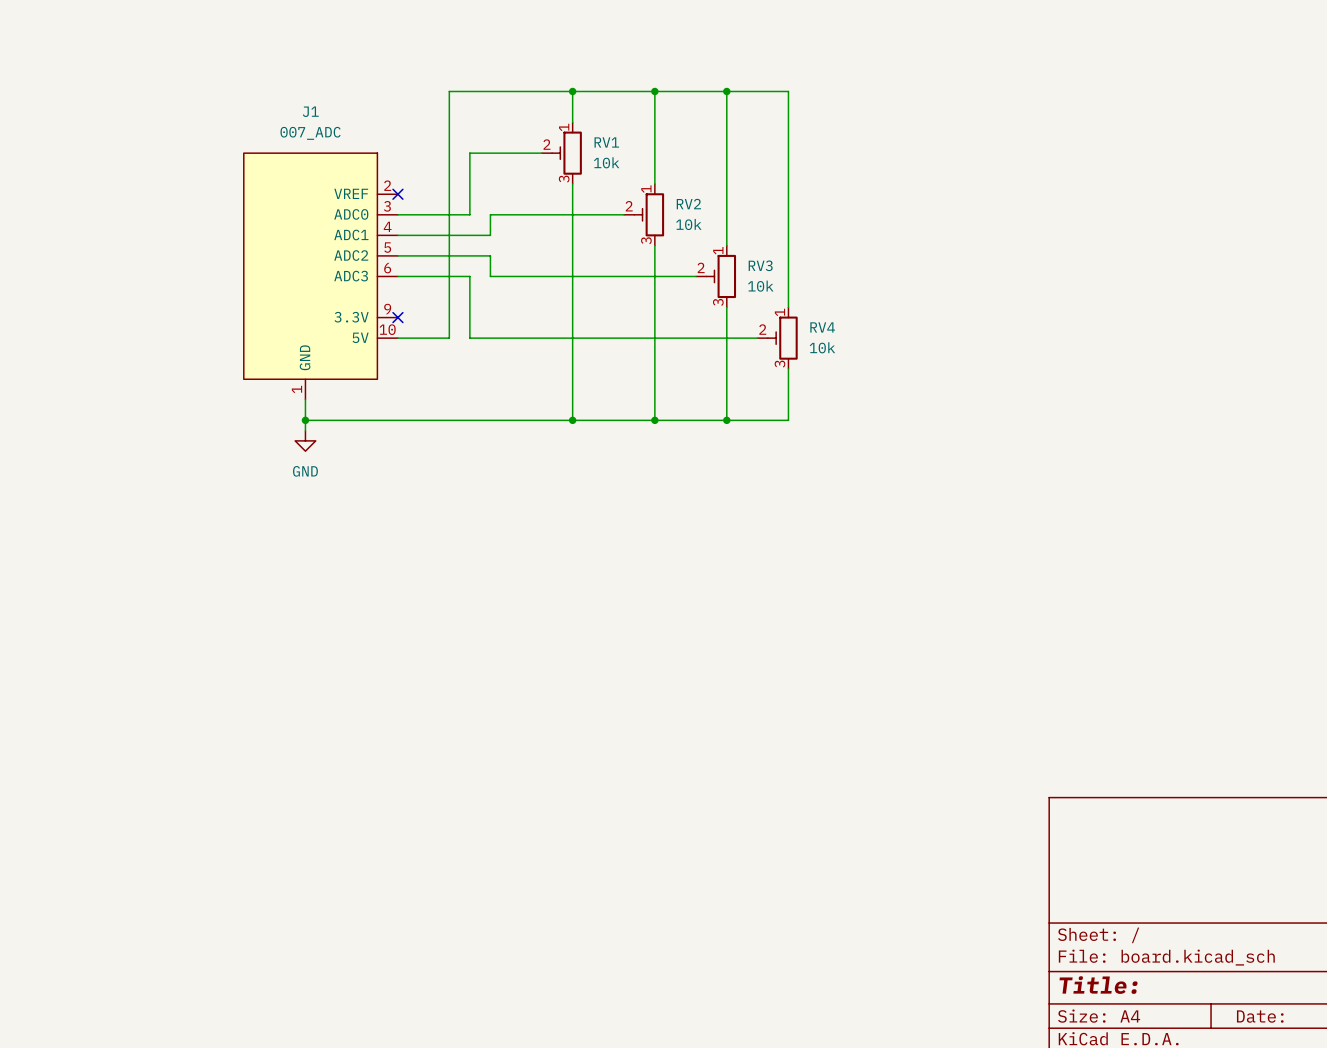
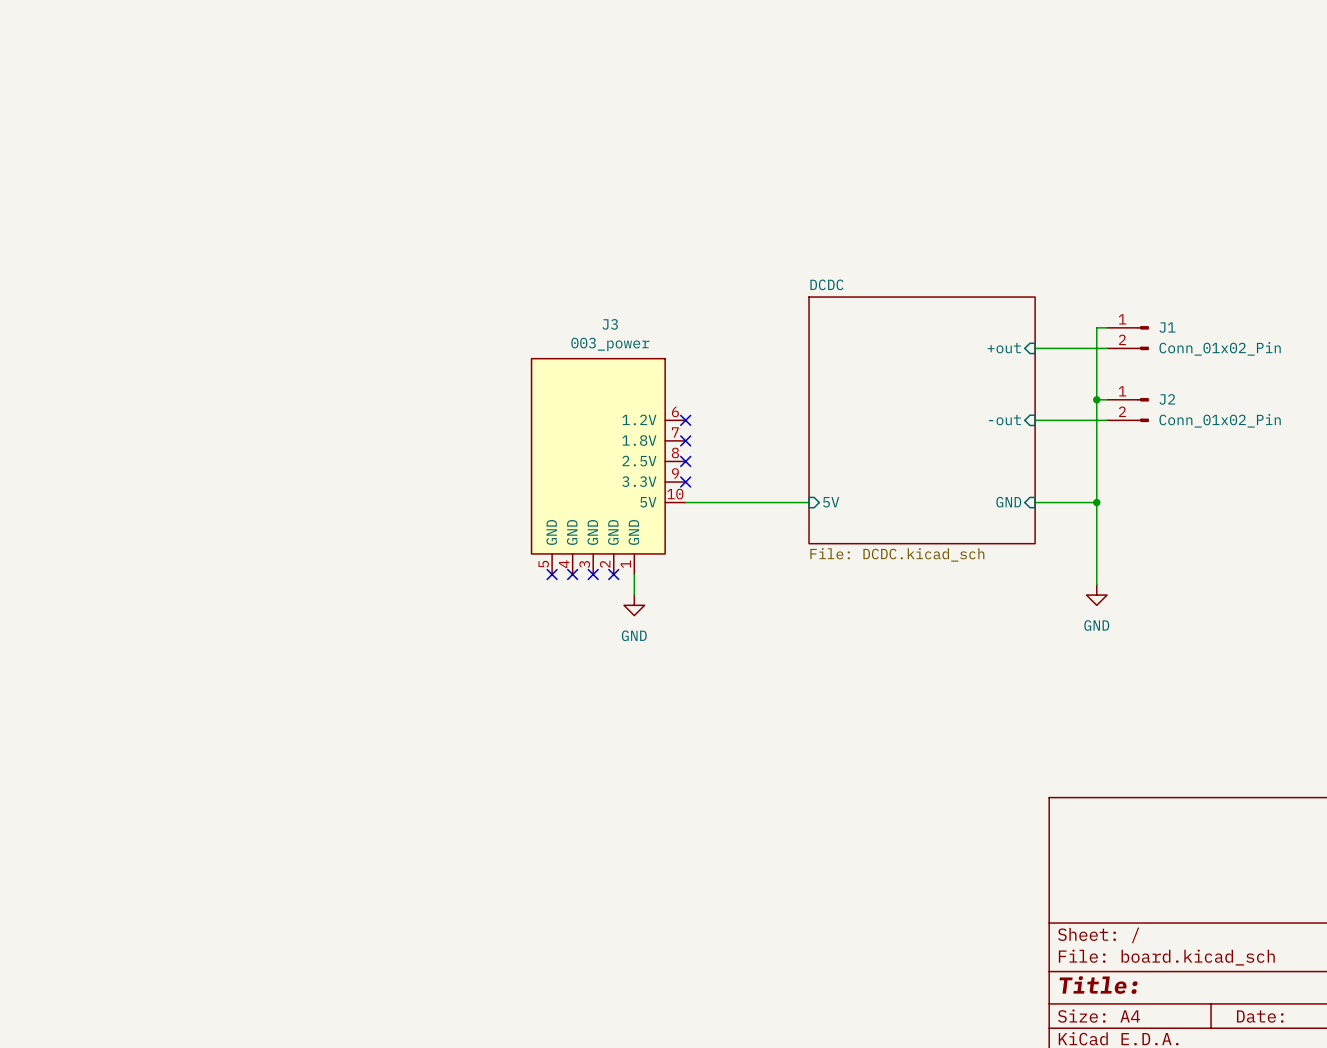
wire: (572, 91) (572, 122) -> none
junction: (572, 91) -> none
wire: (654, 91) (654, 183) -> none
junction: (654, 91) -> none
wire: (726, 91) (726, 245) -> none
junction: (726, 91) -> none
J1 name position: J1 (310, 111) -> J1 (1167, 327)
J1 value: 007_ADC (310, 133) -> Conn_01x02_Pin (1220, 348)
J1 symbol: [243, 153, 398, 400] -> [1107, 326, 1149, 351]
wire: (541, 153) (469, 153) (469, 214) (397, 214) -> none
RV1: 10k (561, 153) -> none
wire: (572, 183) (572, 420) -> none
no-connect mark: (397, 194) -> none
wire: (624, 214) (490, 214) (490, 235) (397, 235) -> none
RV2: 10k (644, 214) -> none
wire: (654, 245) (654, 420) -> none
wire: (397, 255) (490, 255) (490, 276) (695, 276) -> none
wire: (397, 276) (469, 276) (469, 338) (757, 338) -> none
RV3: 10k (716, 276) -> none
wire: (726, 307) (726, 420) -> none
wire: (788, 307) (788, 91) (449, 91) (449, 338) (397, 338) -> none
no-connect mark: (397, 317) -> none
wire: none -> (1107, 327) (1096, 327) (1096, 584)
RV4: 10k (777, 338) -> none
sheet pin: none -> +out (1004, 348)
wire: none -> (1035, 348) (1107, 348)
wire: (788, 368) (788, 420) (305, 420) -> none
wire: (305, 399) (305, 430) -> none
wire: none -> (1096, 399) (1107, 399)
junction: none -> (1096, 399)
J2: none -> Conn_01x02_Pin (1127, 410)
junction: (305, 420) -> none
junction: (572, 420) -> none
junction: (654, 420) -> none
no-connect mark: none -> (685, 420)
junction: (726, 420) -> none
sheet DCDC: none -> File: DCDC.kicad_sch (922, 420)
sheet pin: none -> -out (1004, 420)
wire: none -> (1035, 420) (1107, 420)
power symbol: GND (305, 440) -> none
no-connect mark: none -> (685, 440)
no-connect mark: none -> (685, 461)
J3: none -> 003_power (608, 466)
no-connect mark: none -> (685, 482)
wire: none -> (685, 502) (809, 502)
sheet pin: none -> 5V (831, 502)
sheet pin: none -> GND (1008, 502)
wire: none -> (1035, 502) (1096, 502)
junction: none -> (1096, 502)
no-connect mark: none -> (552, 574)
no-connect mark: none -> (572, 574)
no-connect mark: none -> (593, 574)
no-connect mark: none -> (613, 574)
wire: none -> (634, 574) (634, 595)
power symbol: none -> GND (1096, 595)
power symbol: none -> GND (634, 605)

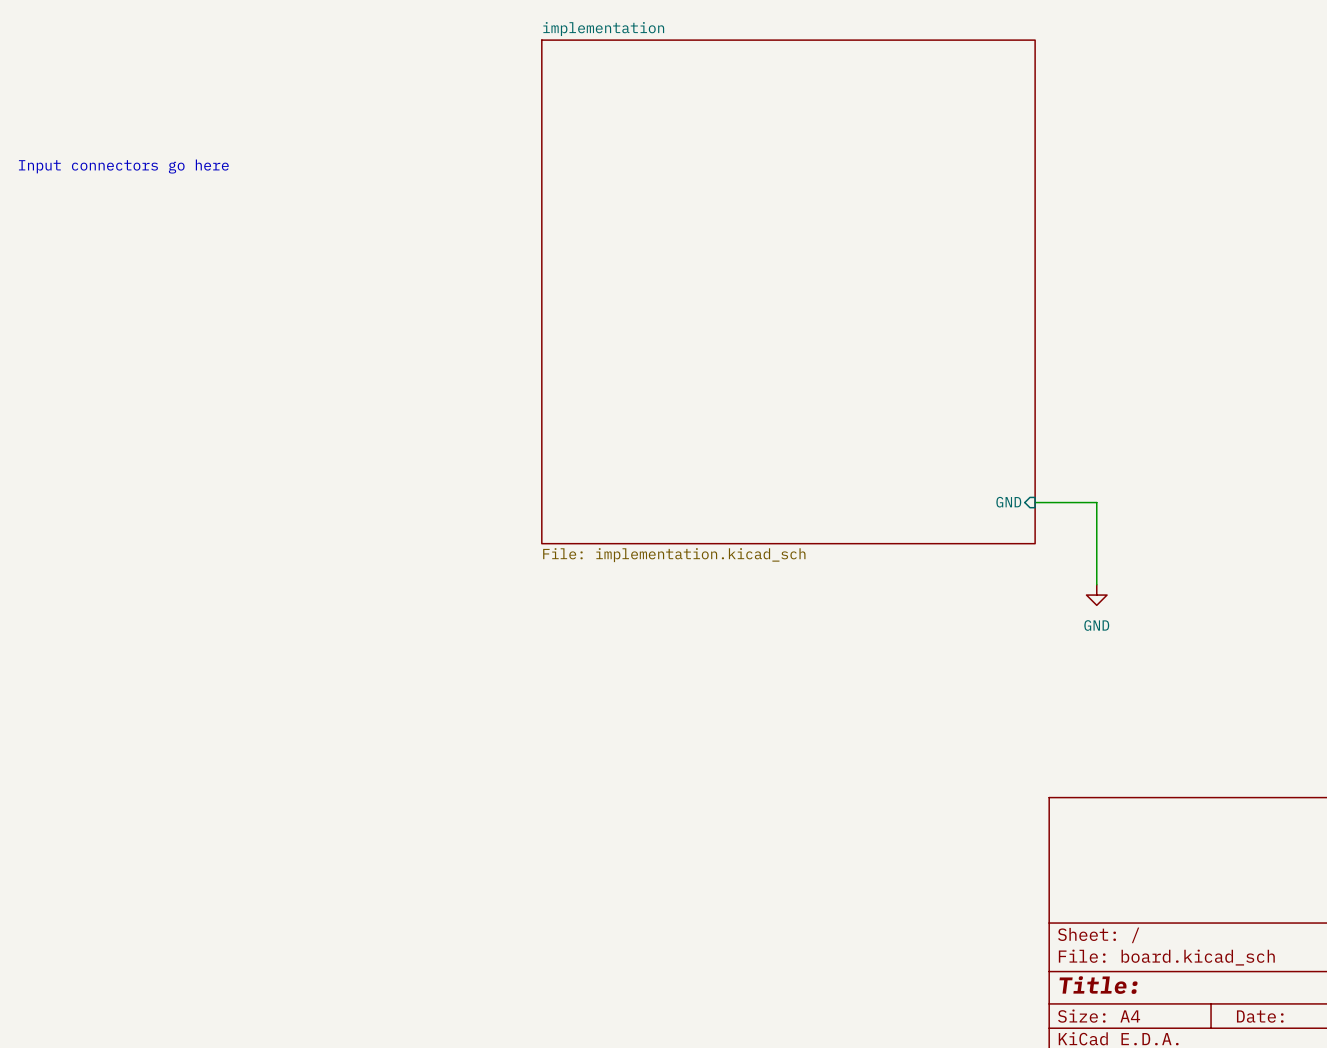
text: none -> Input connectors go here (123, 166)
sheet implementation: none -> File: implementation.kicad_sch (788, 291)
wire: (1107, 327) (1096, 327) (1096, 502) -> none
J1: Conn_01x02_Pin (1127, 338) -> none
sheet pin: +out (1004, 348) -> none
wire: (1035, 348) (1107, 348) -> none
wire: (1096, 399) (1107, 399) -> none
junction: (1096, 399) -> none
J2: Conn_01x02_Pin (1127, 410) -> none
no-connect mark: (685, 420) -> none
sheet DCDC: File: DCDC.kicad_sch (922, 420) -> none
sheet pin: -out (1004, 420) -> none
wire: (1035, 420) (1107, 420) -> none
no-connect mark: (685, 440) -> none
no-connect mark: (685, 461) -> none
J3: 003_power (608, 466) -> none
no-connect mark: (685, 482) -> none
wire: (685, 502) (809, 502) -> none
sheet pin: 5V (831, 502) -> none
junction: (1096, 502) -> none
no-connect mark: (552, 574) -> none
no-connect mark: (572, 574) -> none
no-connect mark: (593, 574) -> none
no-connect mark: (613, 574) -> none
wire: (634, 574) (634, 595) -> none
power symbol: GND (634, 605) -> none

